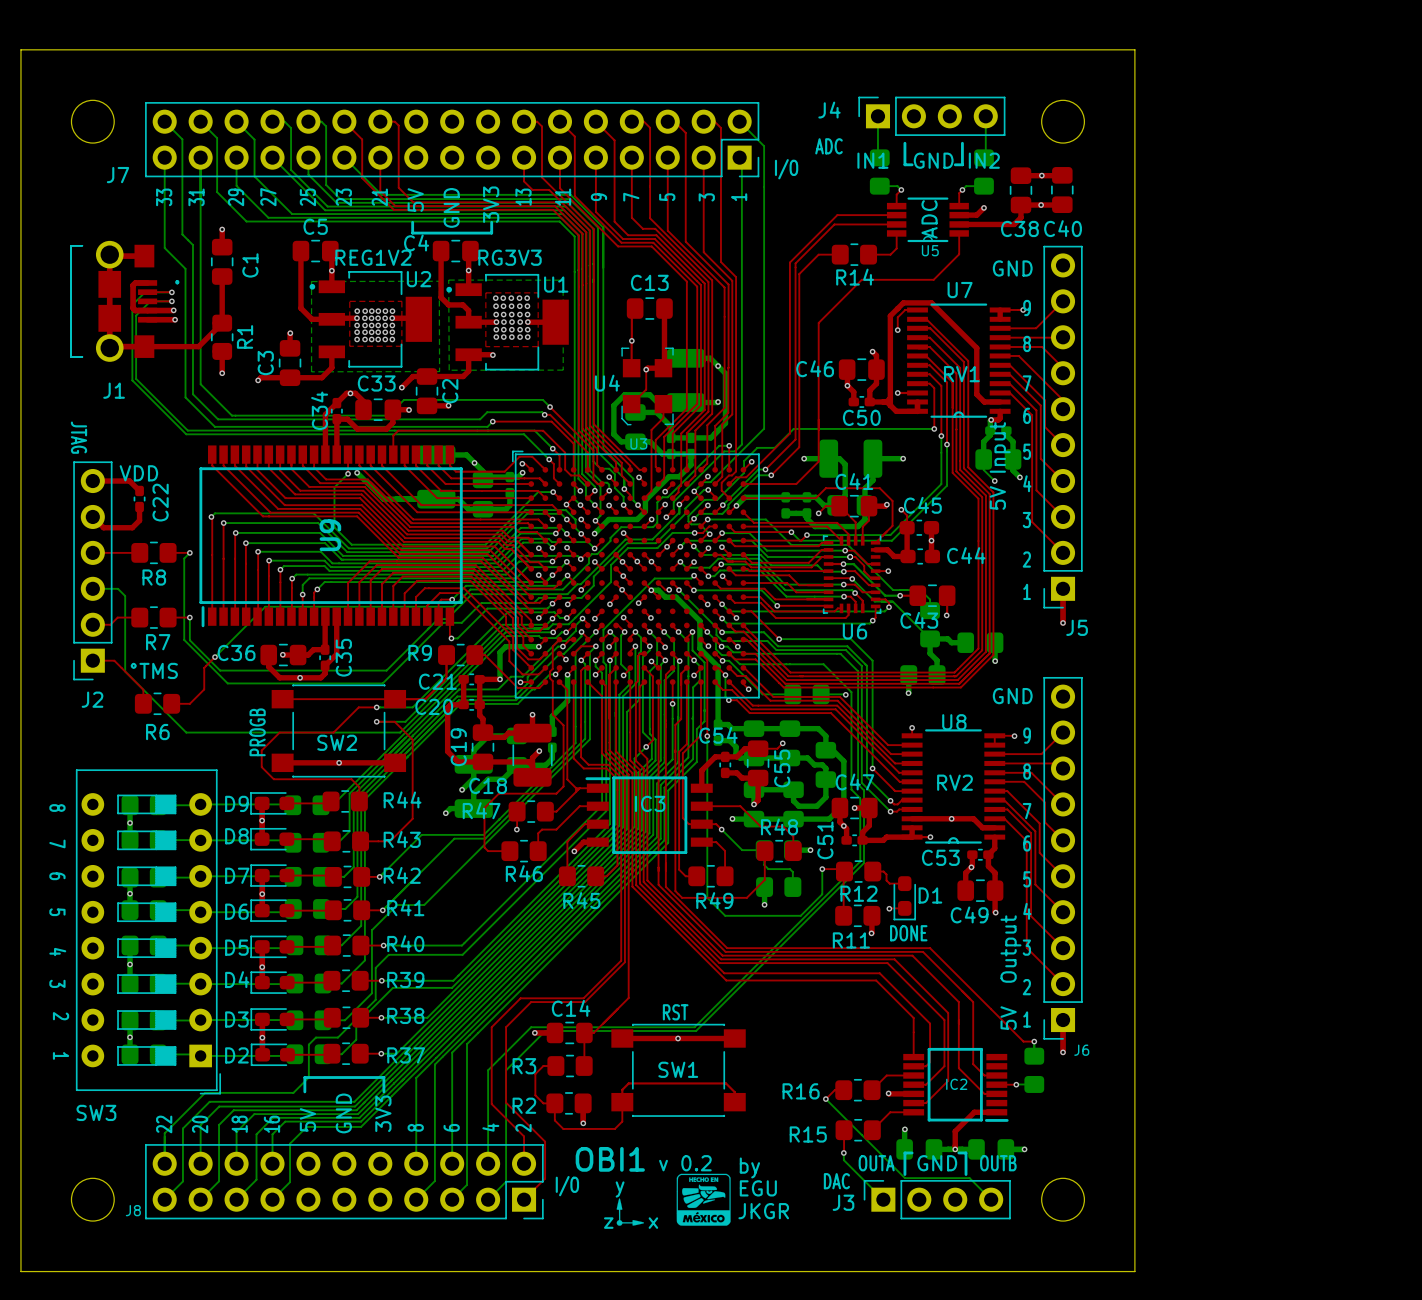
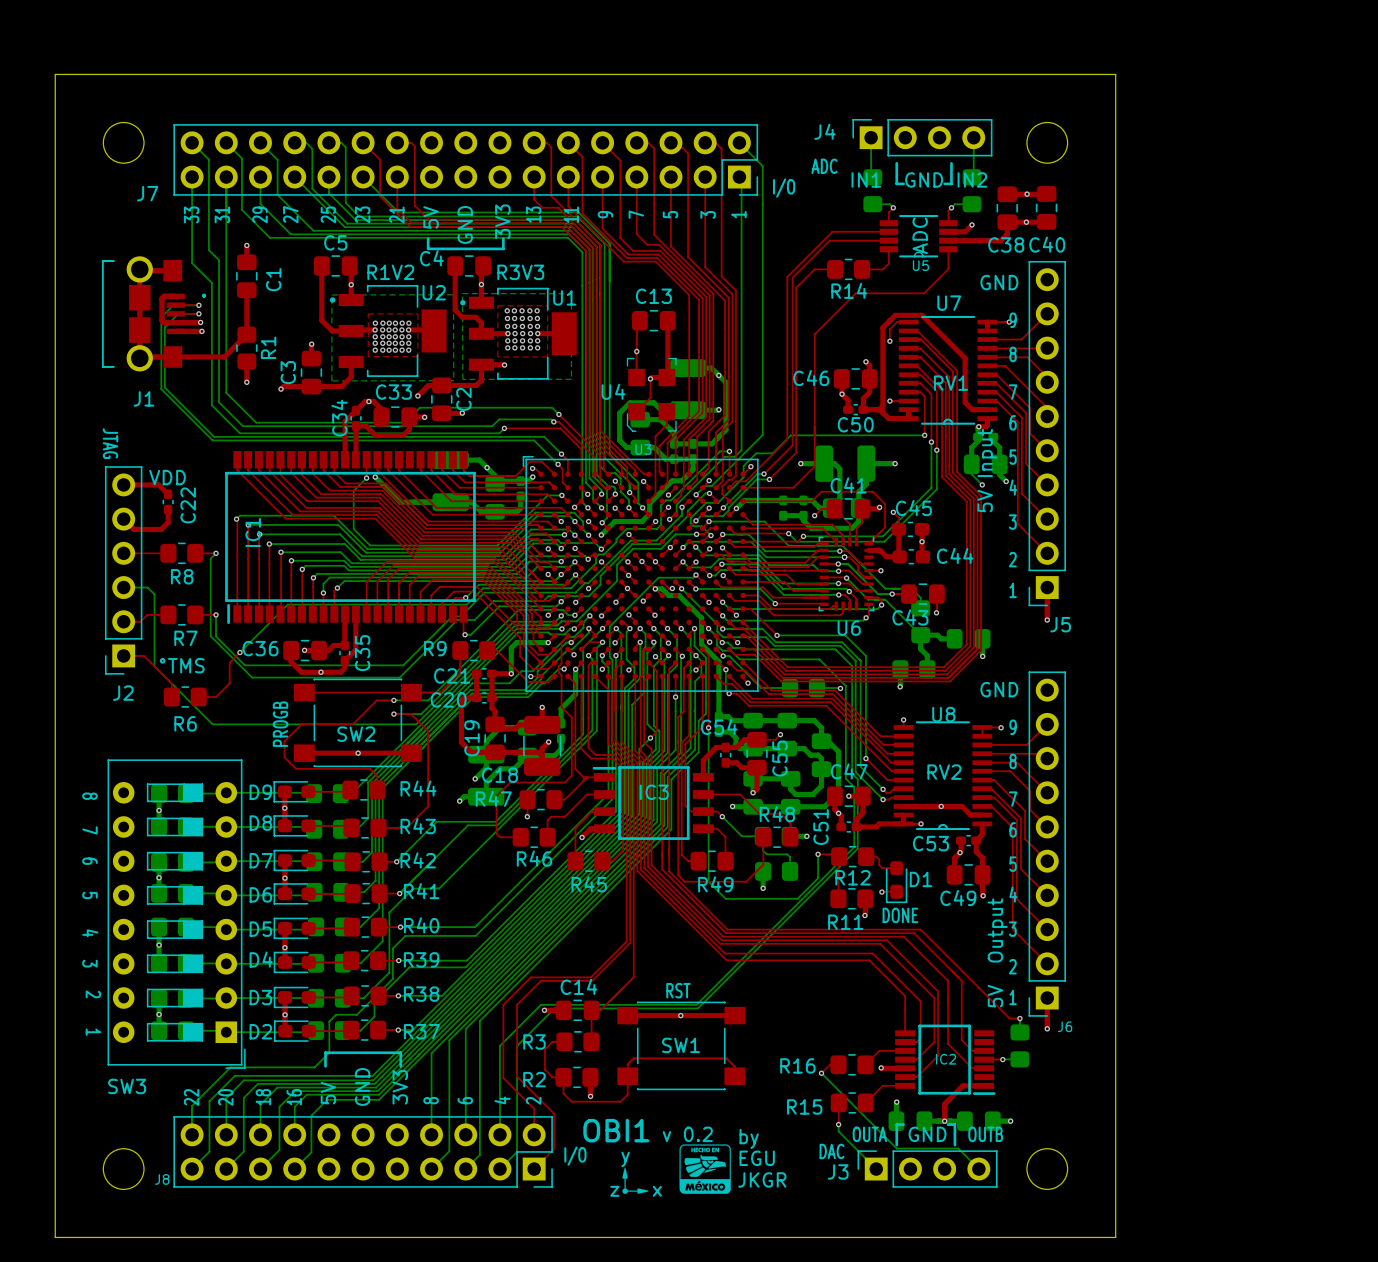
U2 value: REG1V2 (373, 257) -> R1V2 (390, 272)
U1 value: RG3V3 (510, 257) -> R3V3 (520, 272)
top track: (393, 454) (393, 435) (398, 430) (543, 430) (565, 452) (565, 469) (570, 475) (579, 475) (587, 483) -> none
U9 name: U9 (330, 535) -> IC1 (253, 532)

